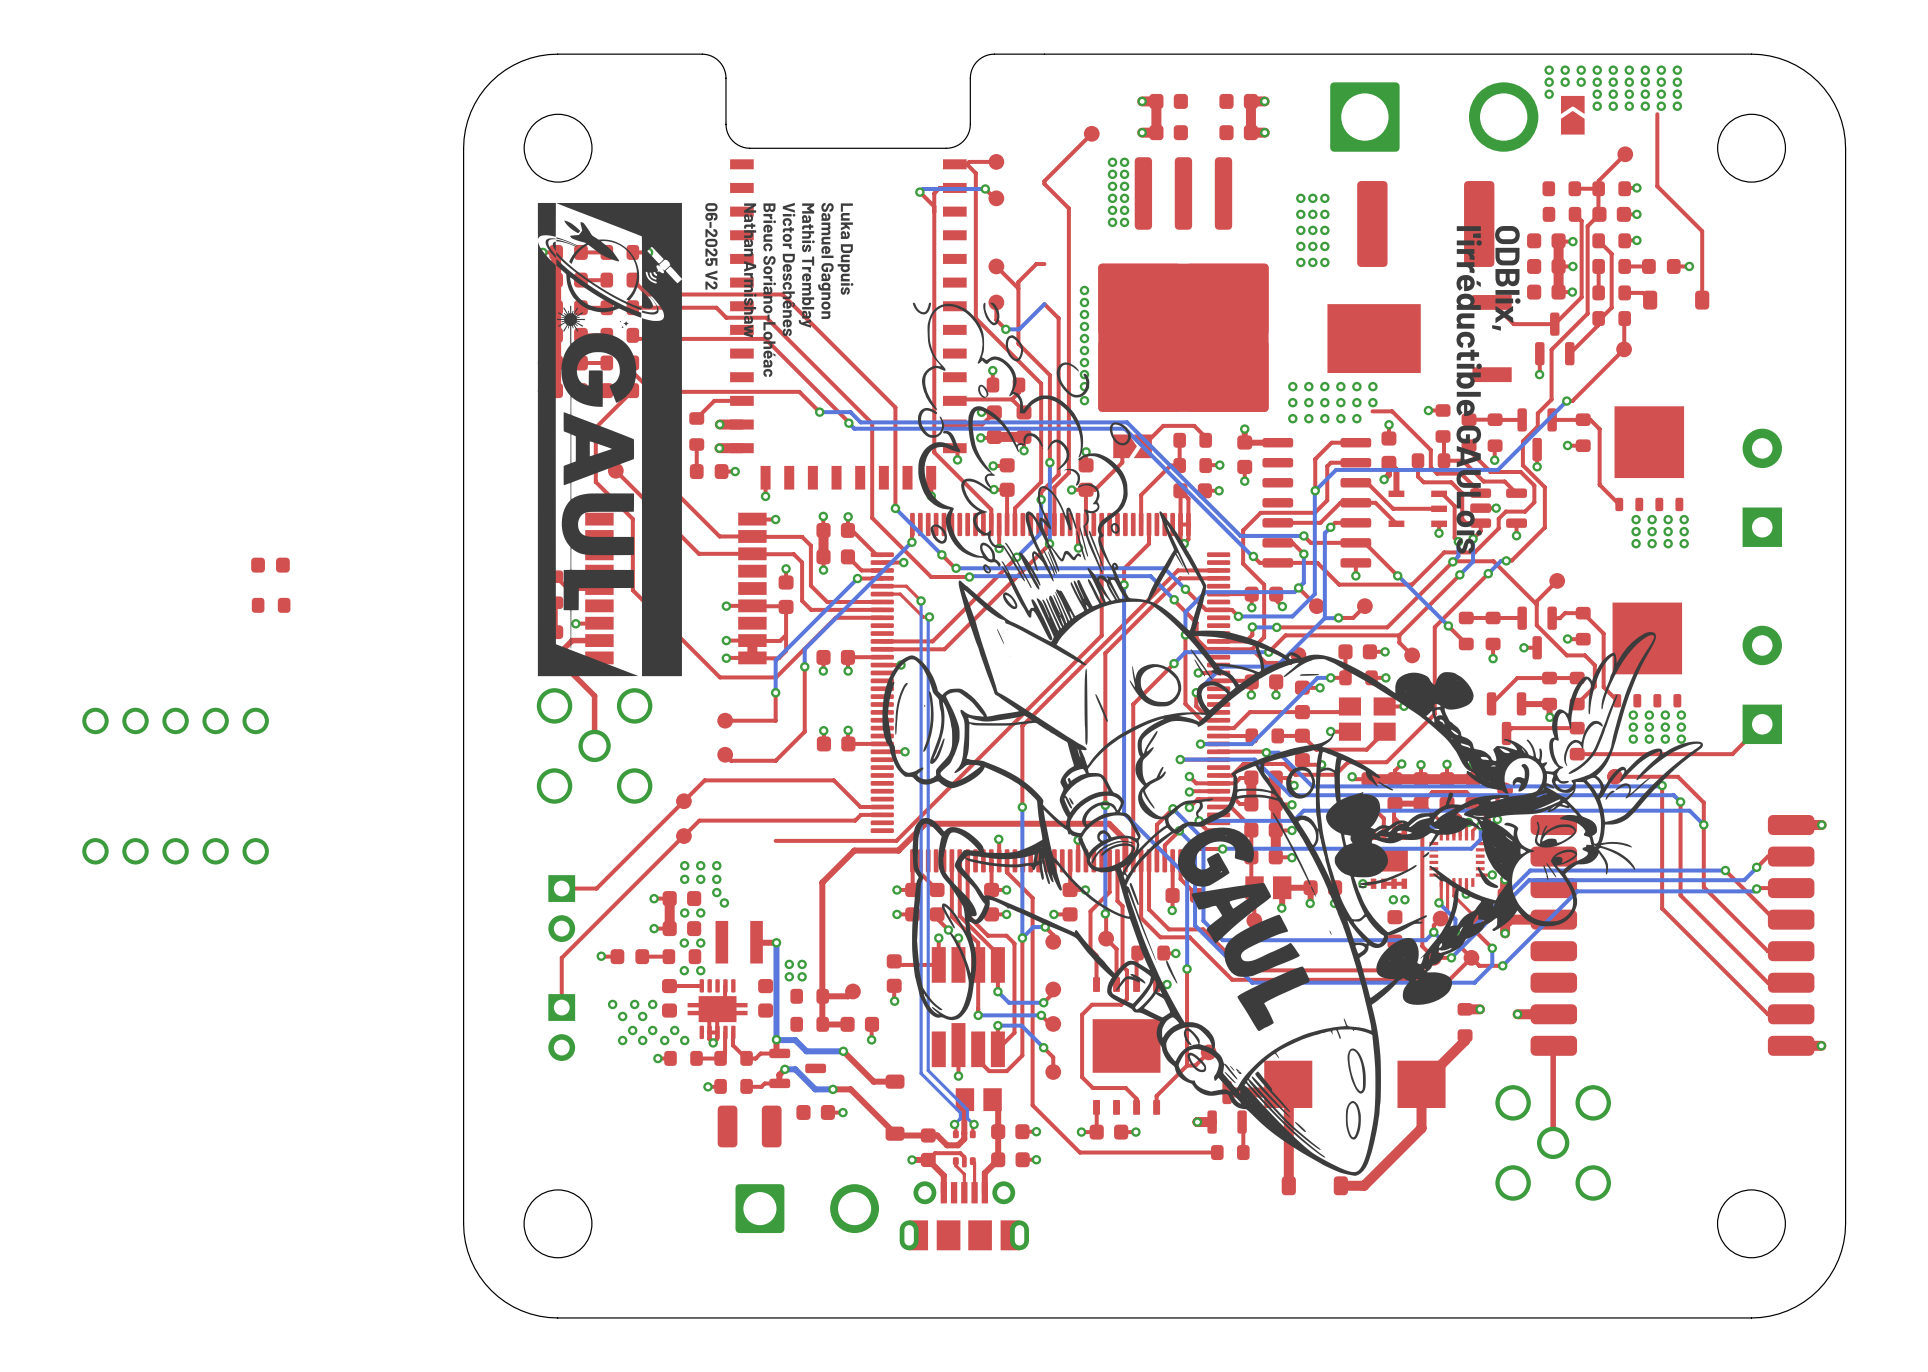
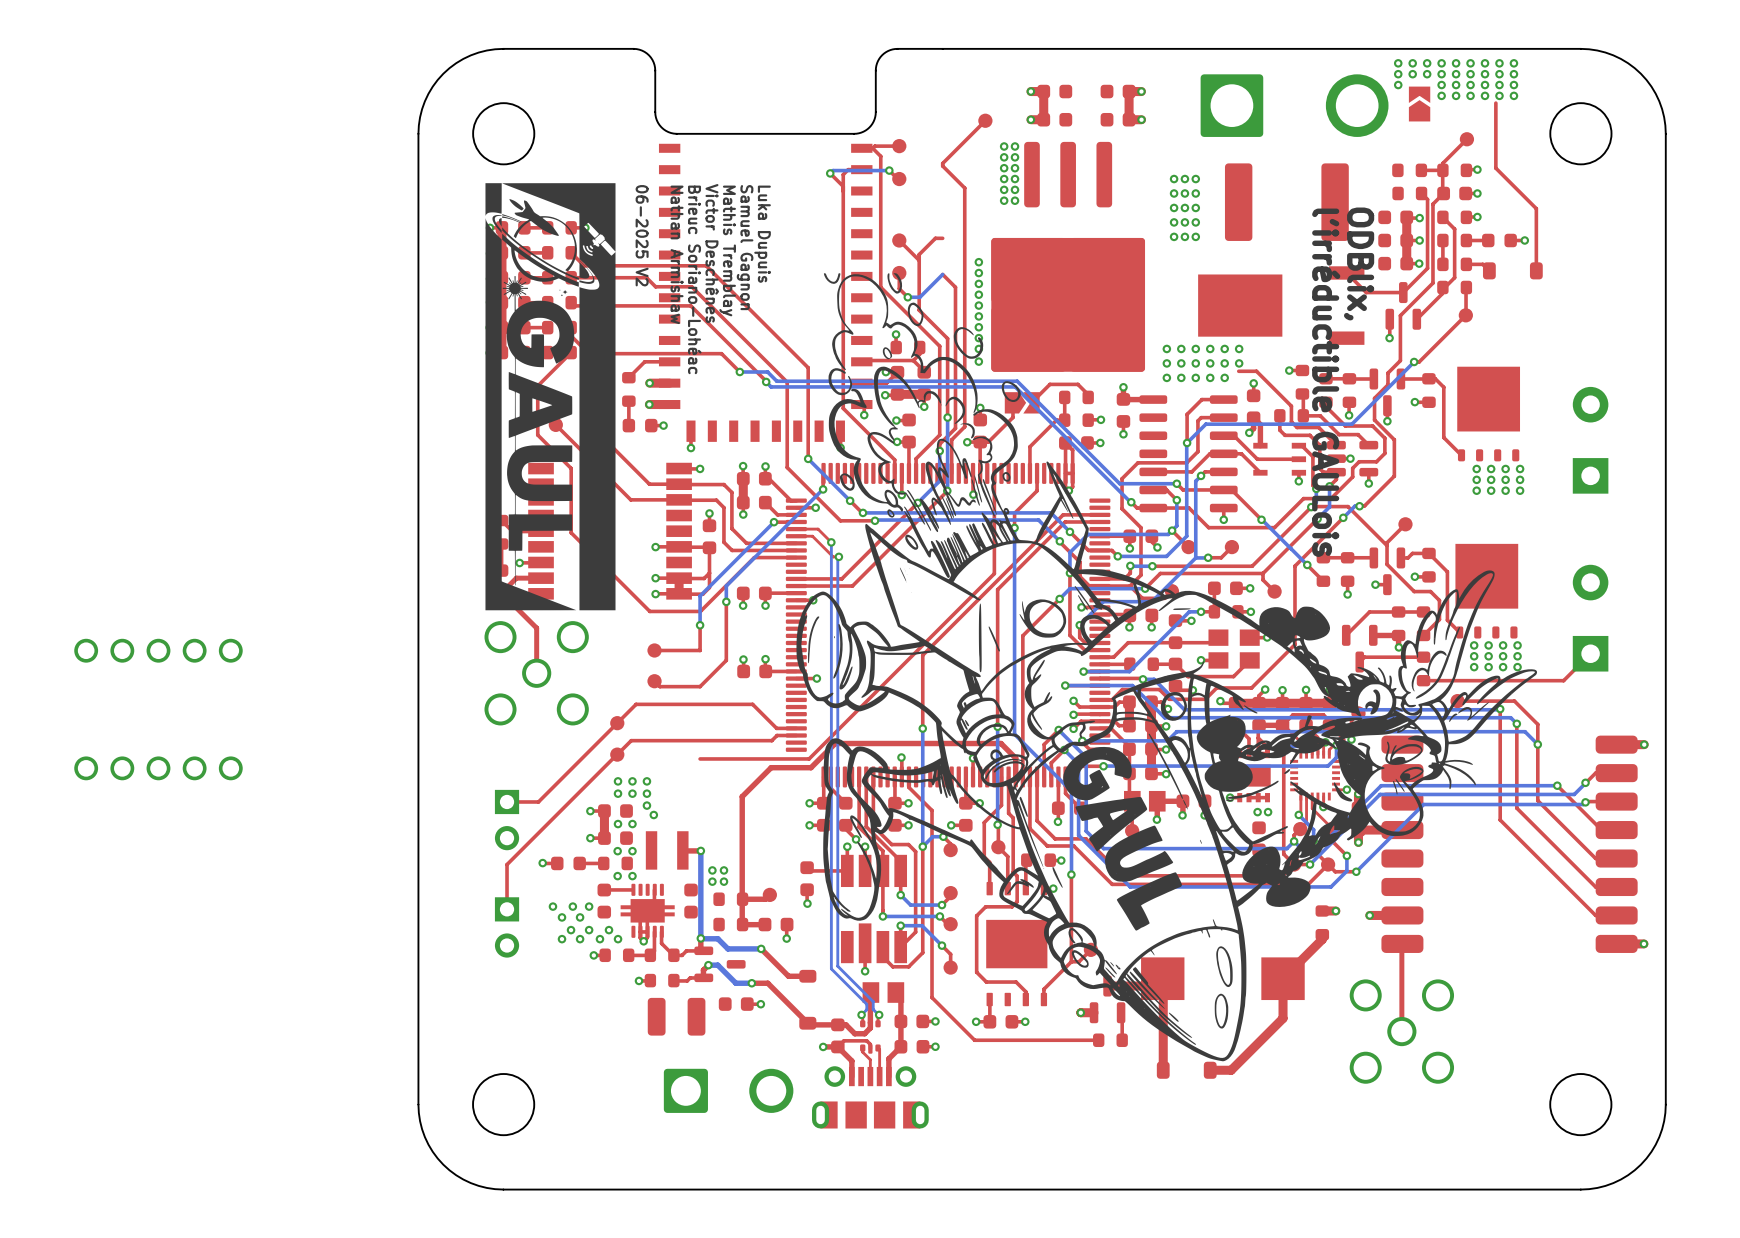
part: (270, 565) -> none
part: (271, 605) -> none

